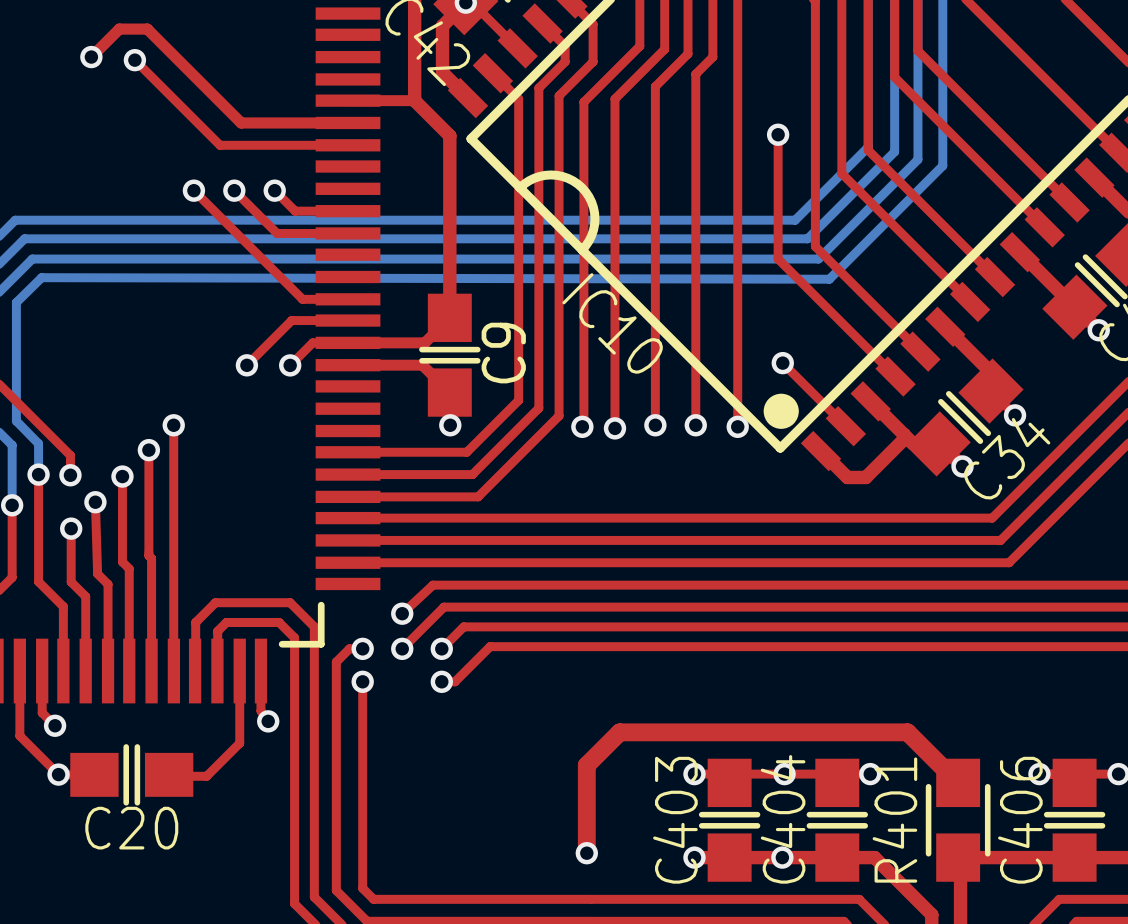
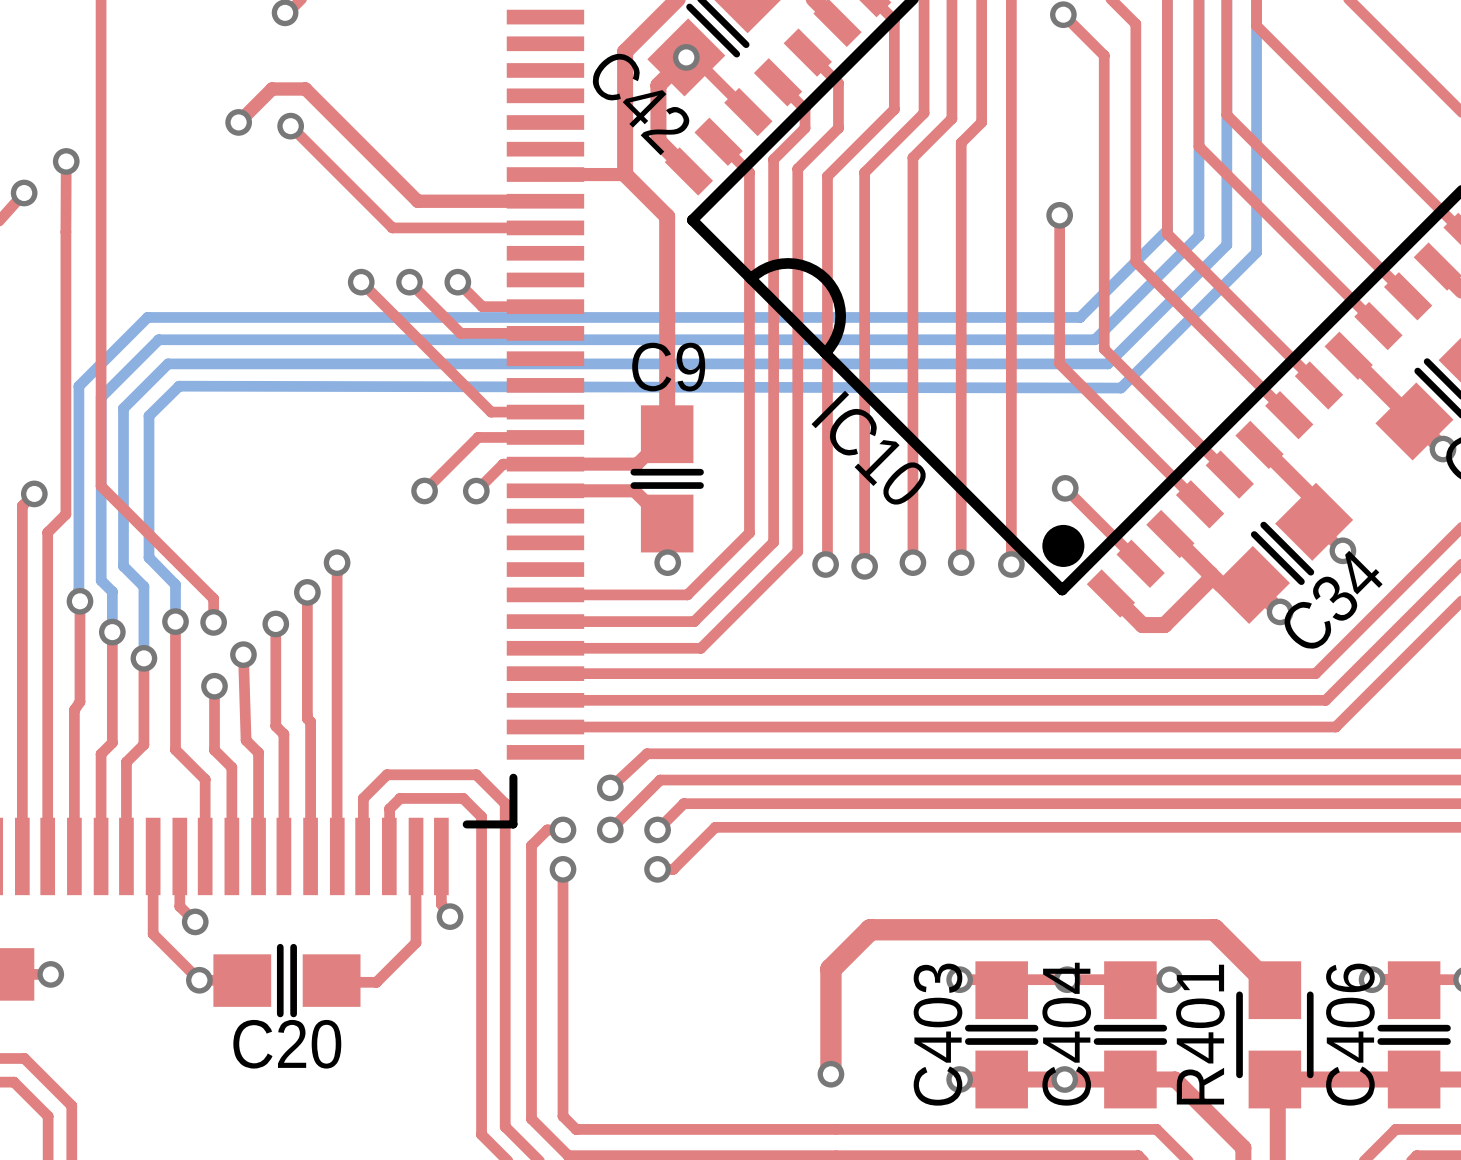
C9 name rotation: 0° (503, 353) -> 90° clockwise (668, 367)
C9 name position: C9 (503, 353) -> C9 (668, 367)

